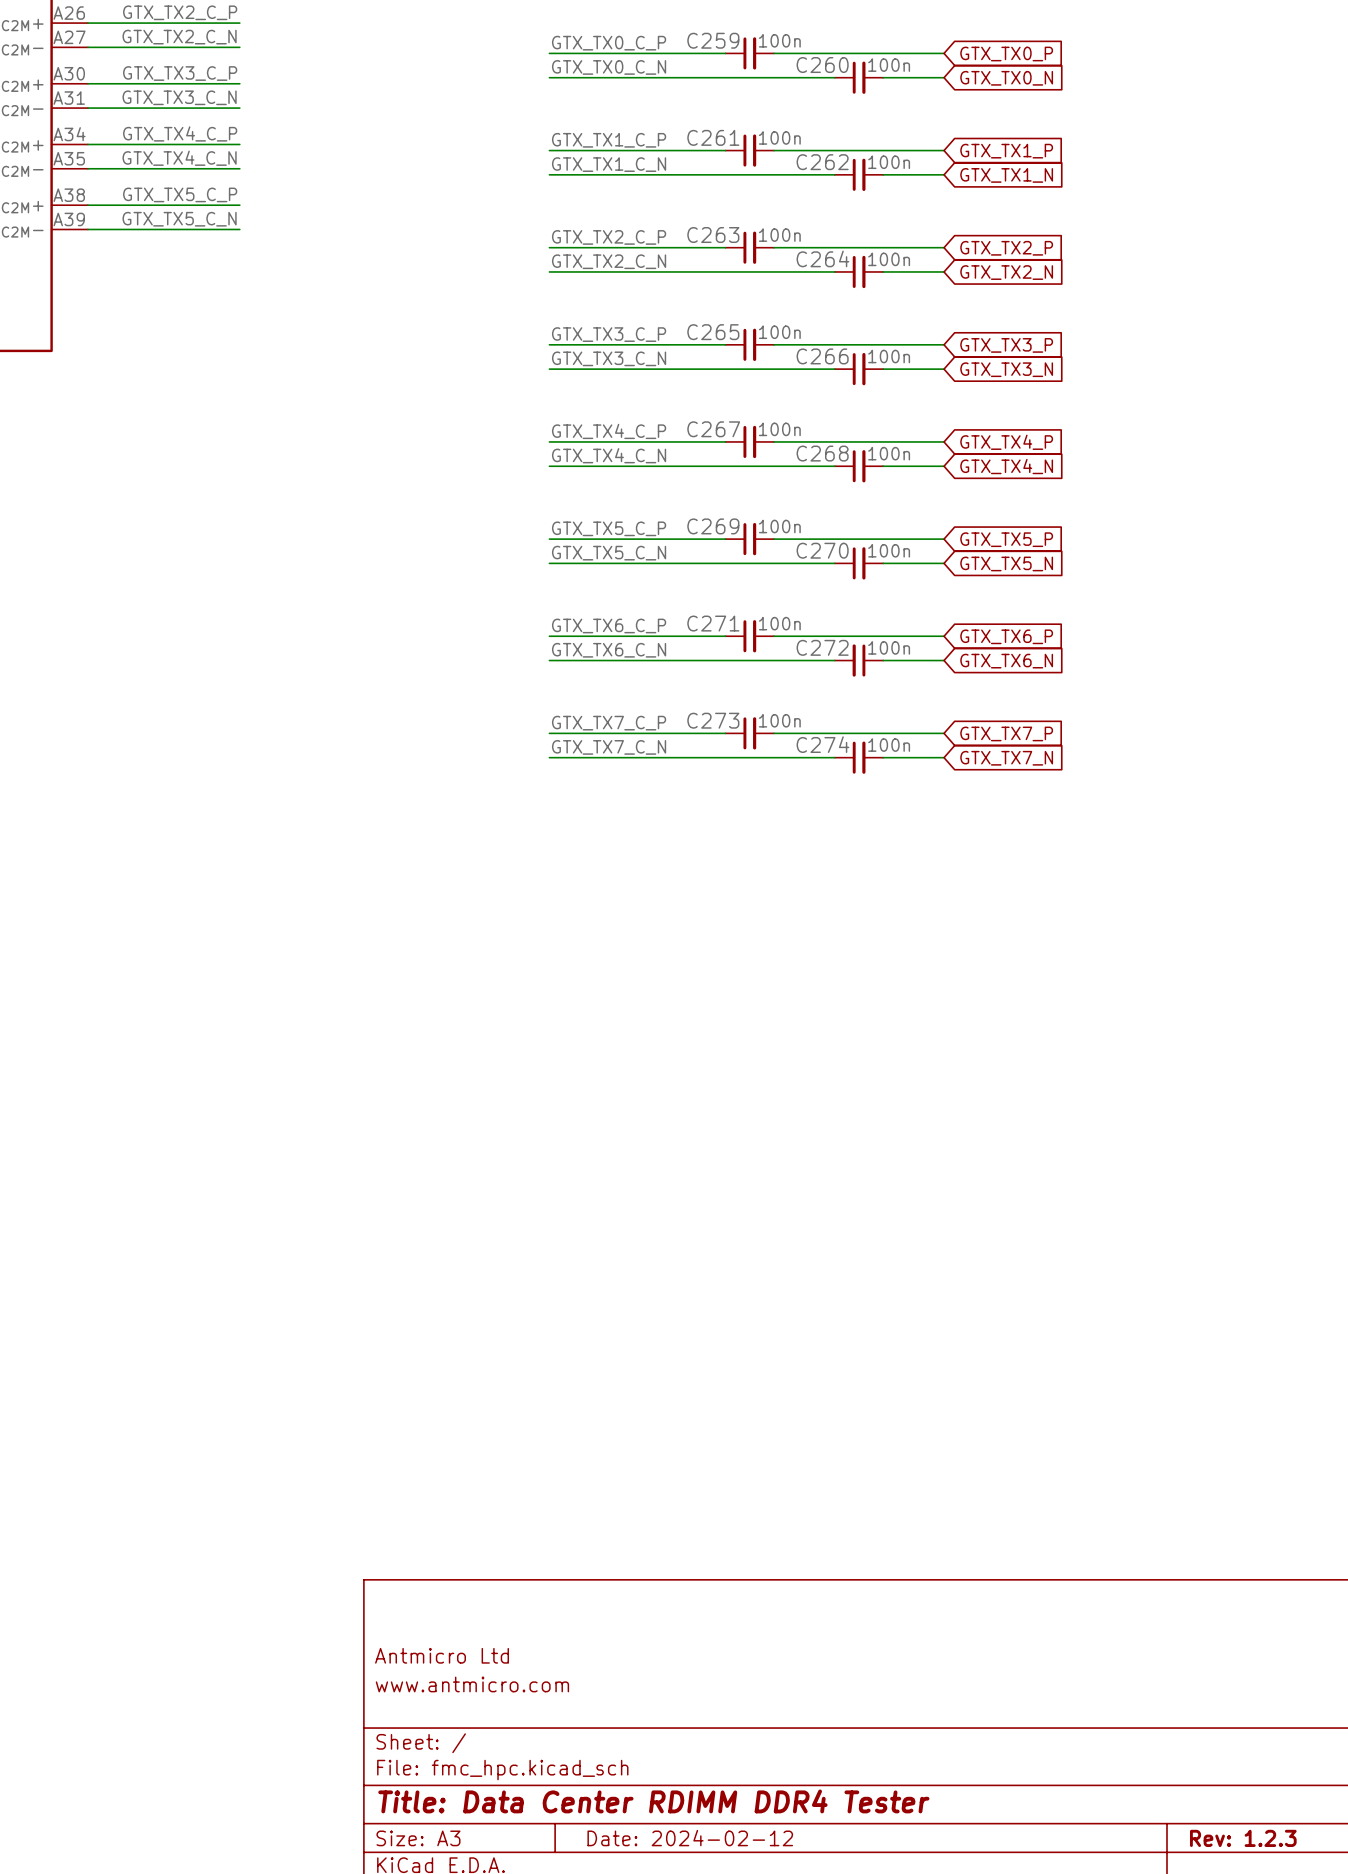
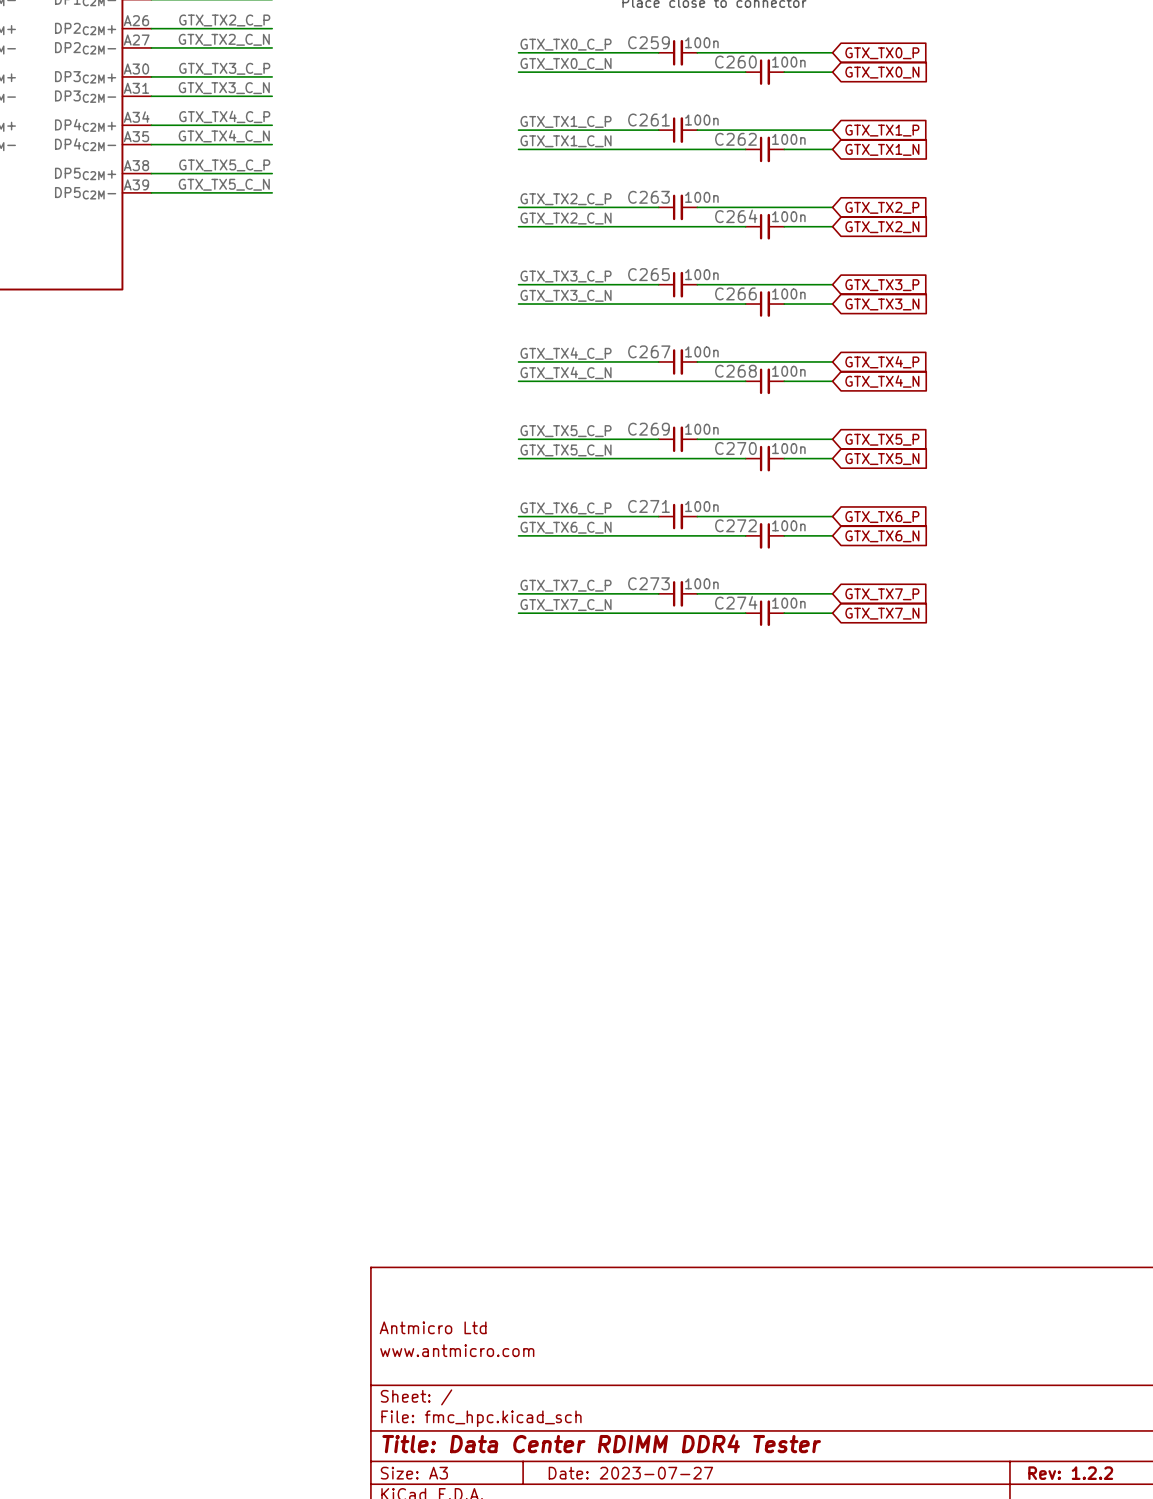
title block: Date: 2024-02-12 (690, 1838) -> Date: 2023-07-27 (630, 1473)
title block: Rev: 1.2.3 (1243, 1838) -> Rev: 1.2.2 (1070, 1473)

